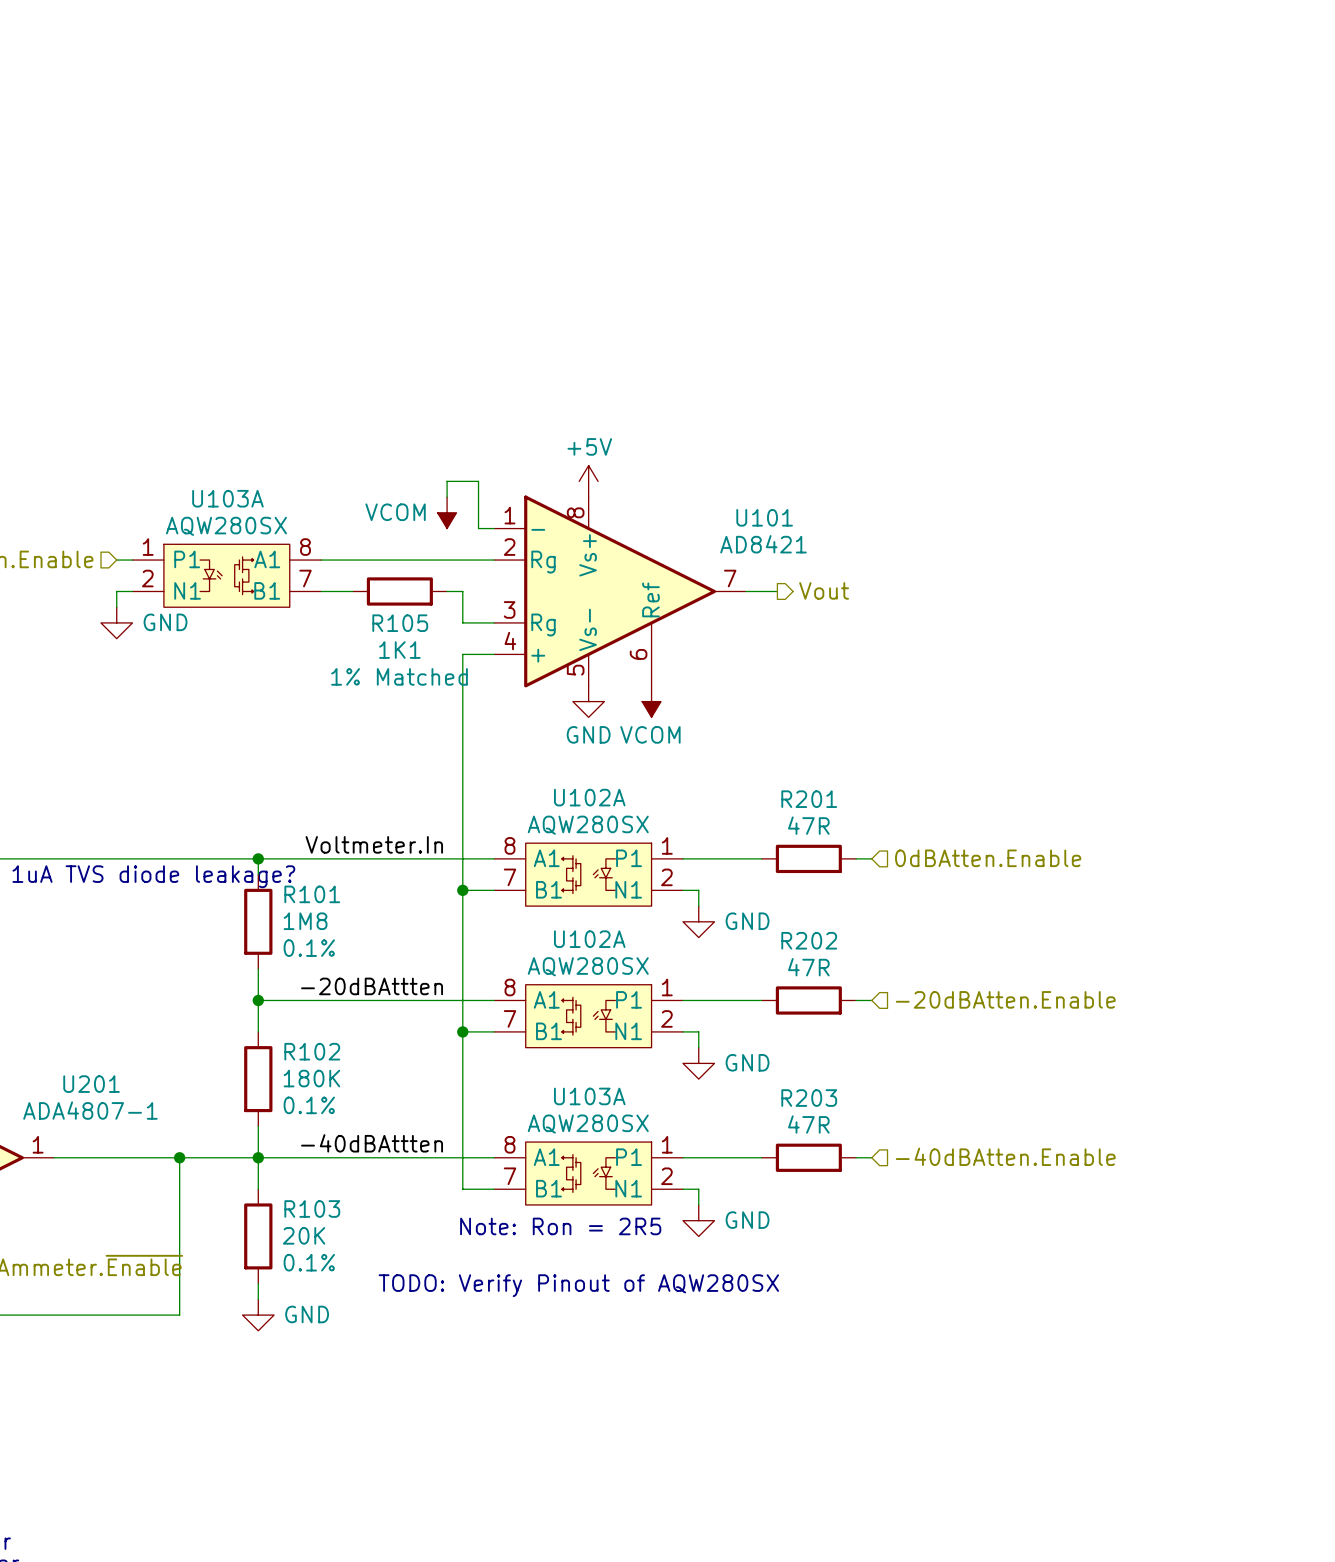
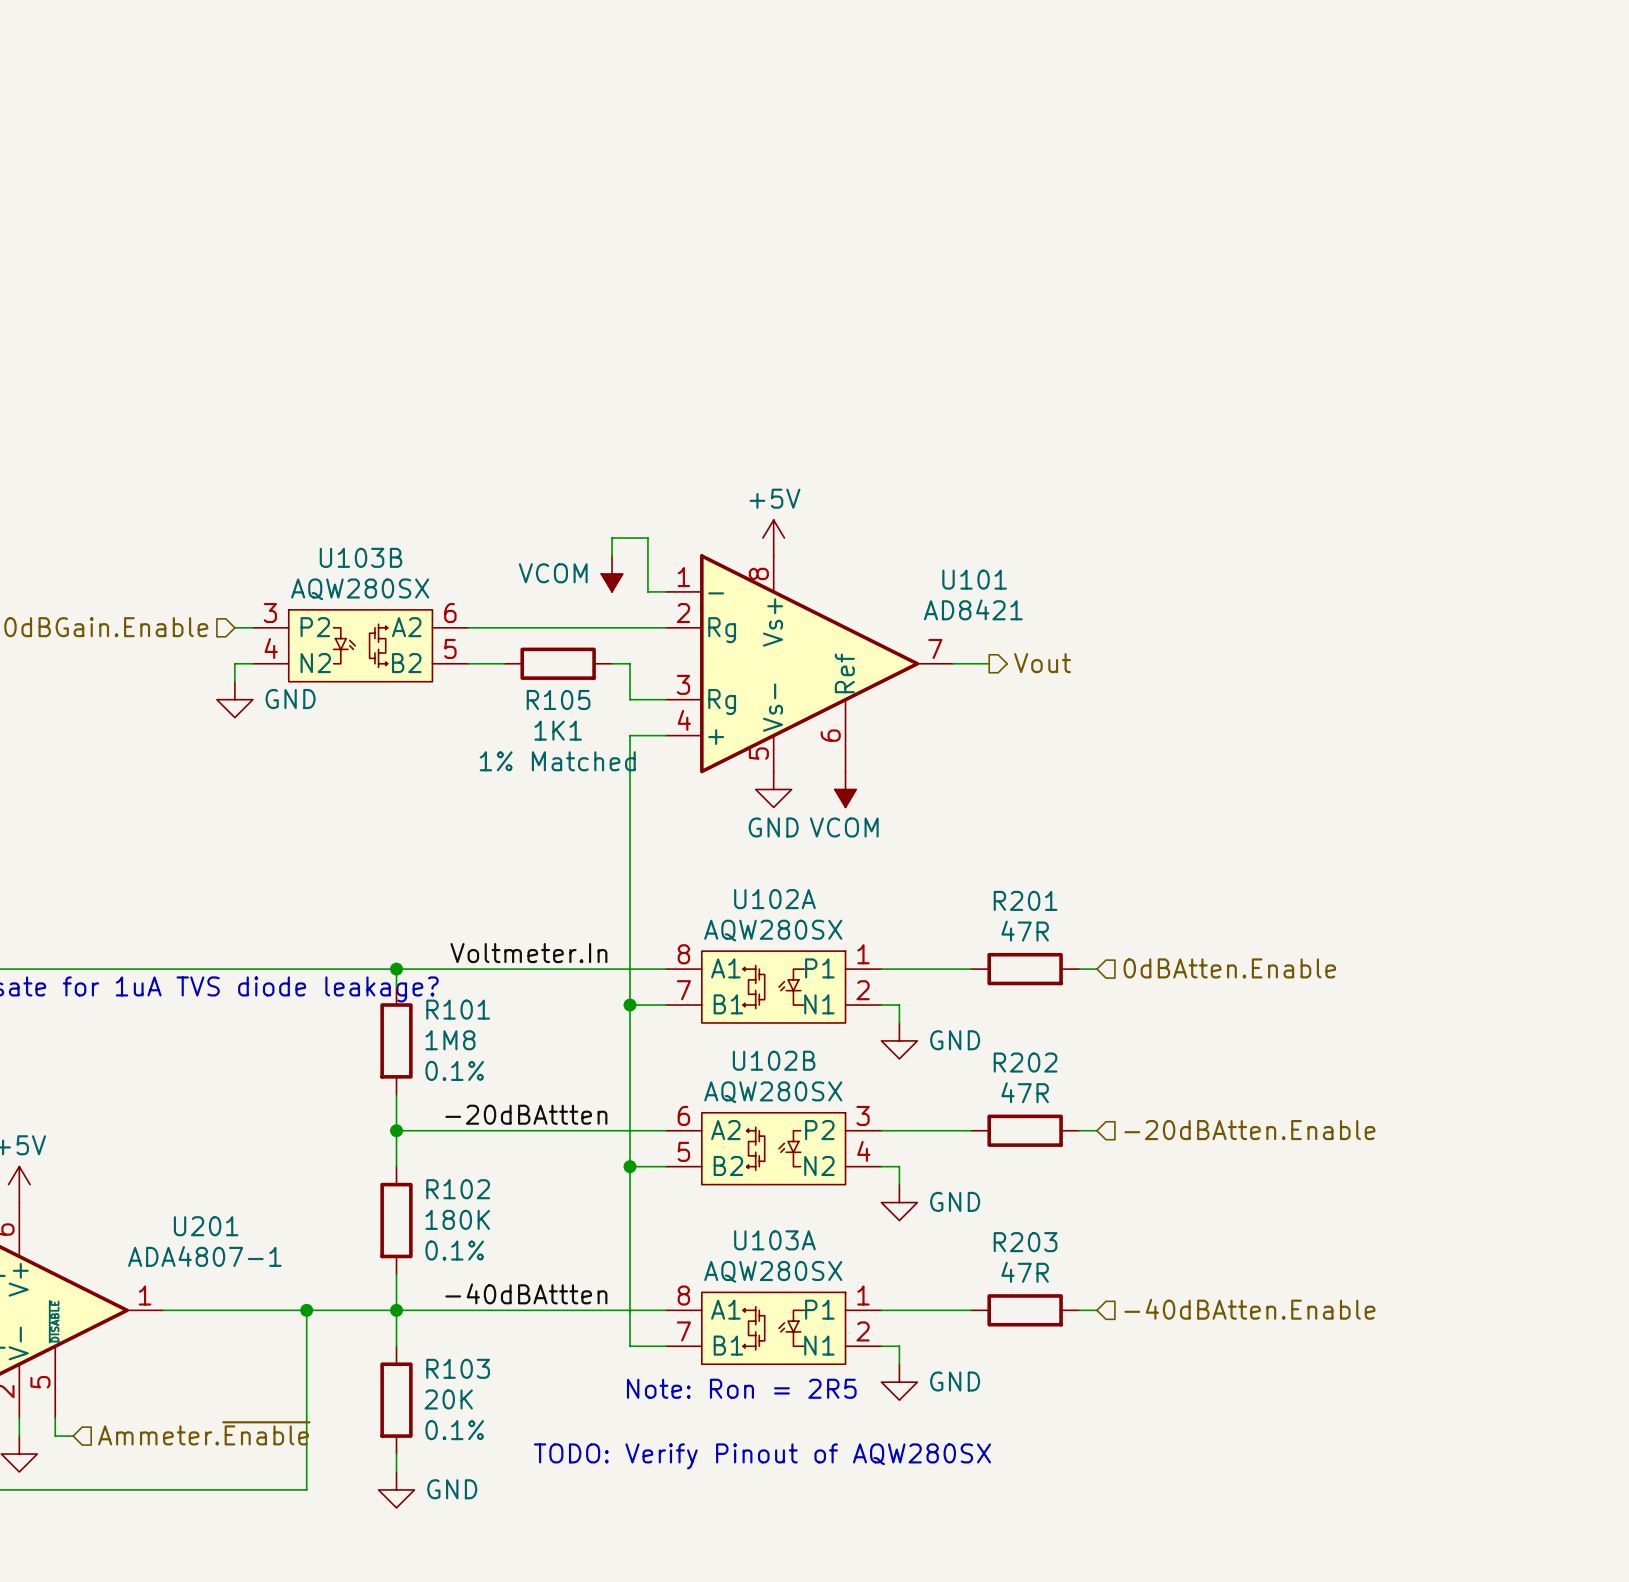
U103A: AQW280SX (226, 575) -> none
U103B: none -> AQW280SX (360, 645)
U102A: AQW280SX (588, 1016) -> none
U102B: none -> AQW280SX (773, 1148)

